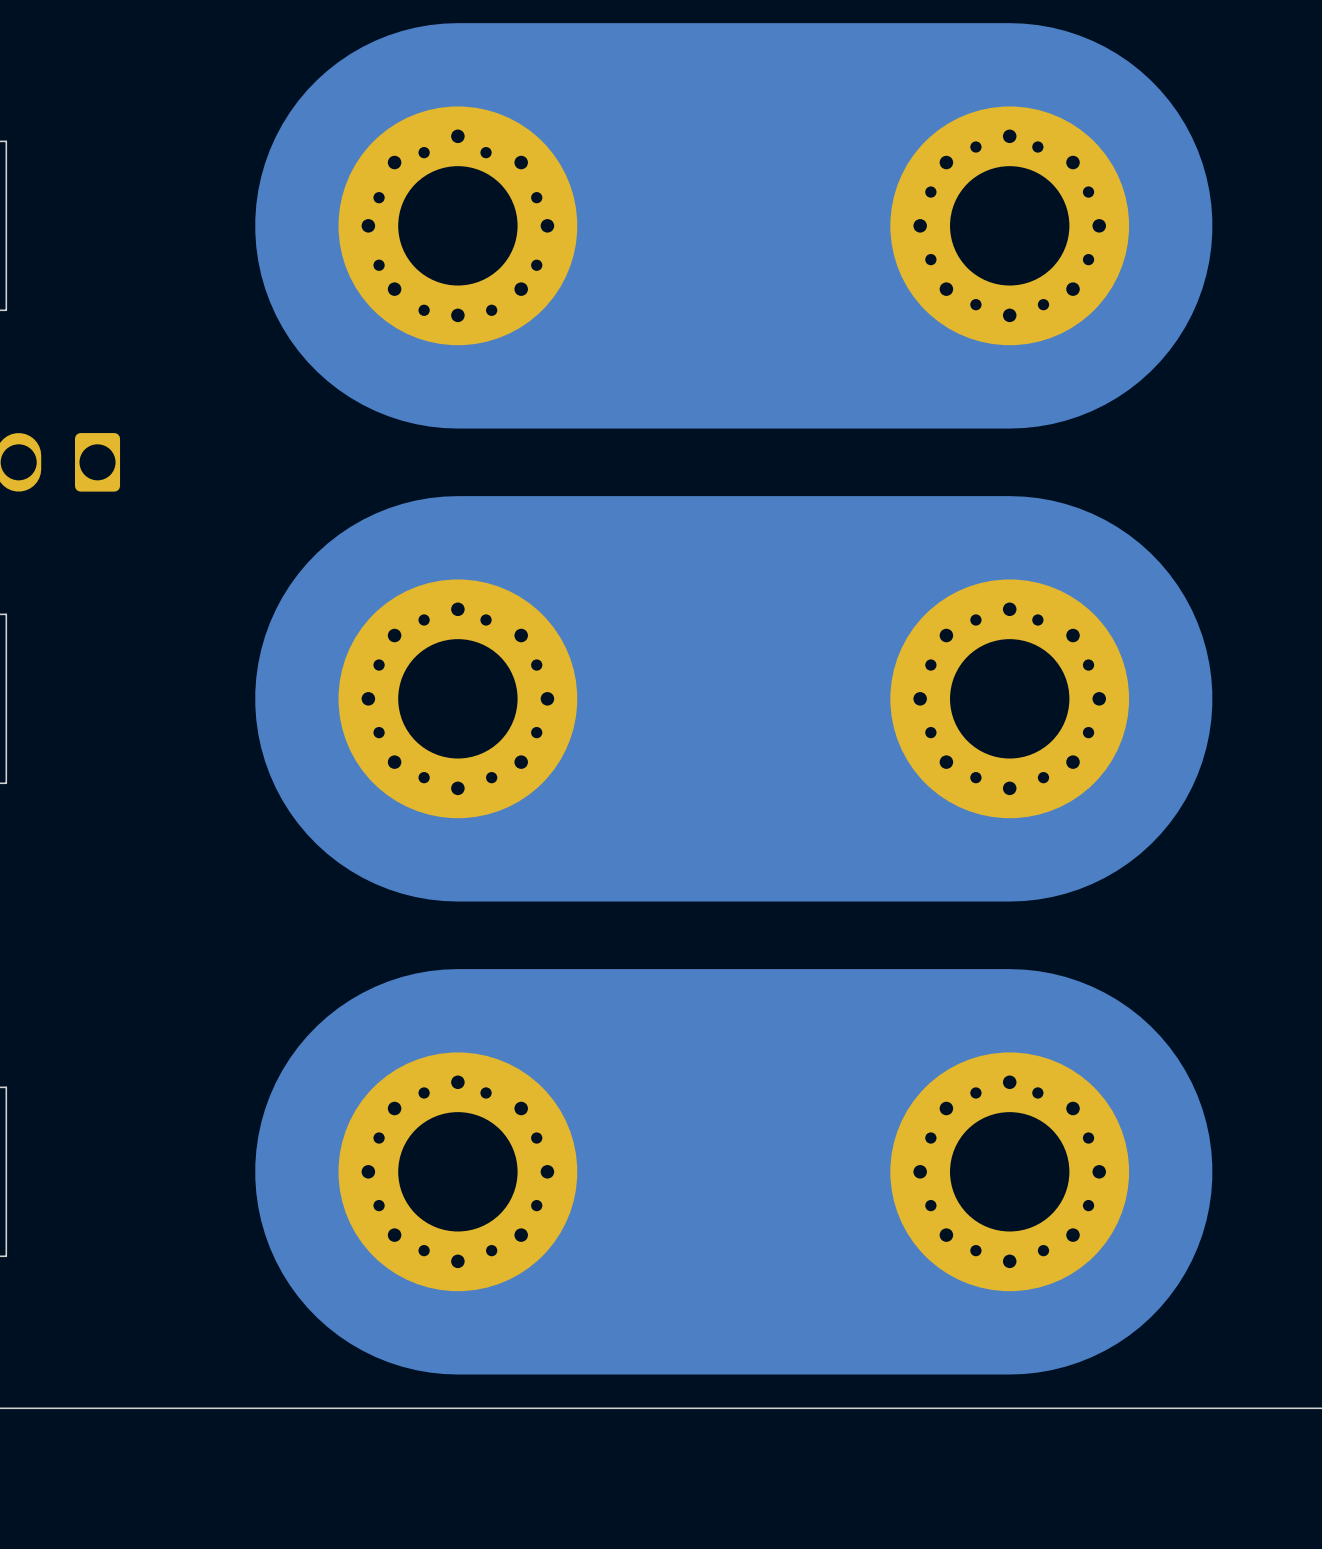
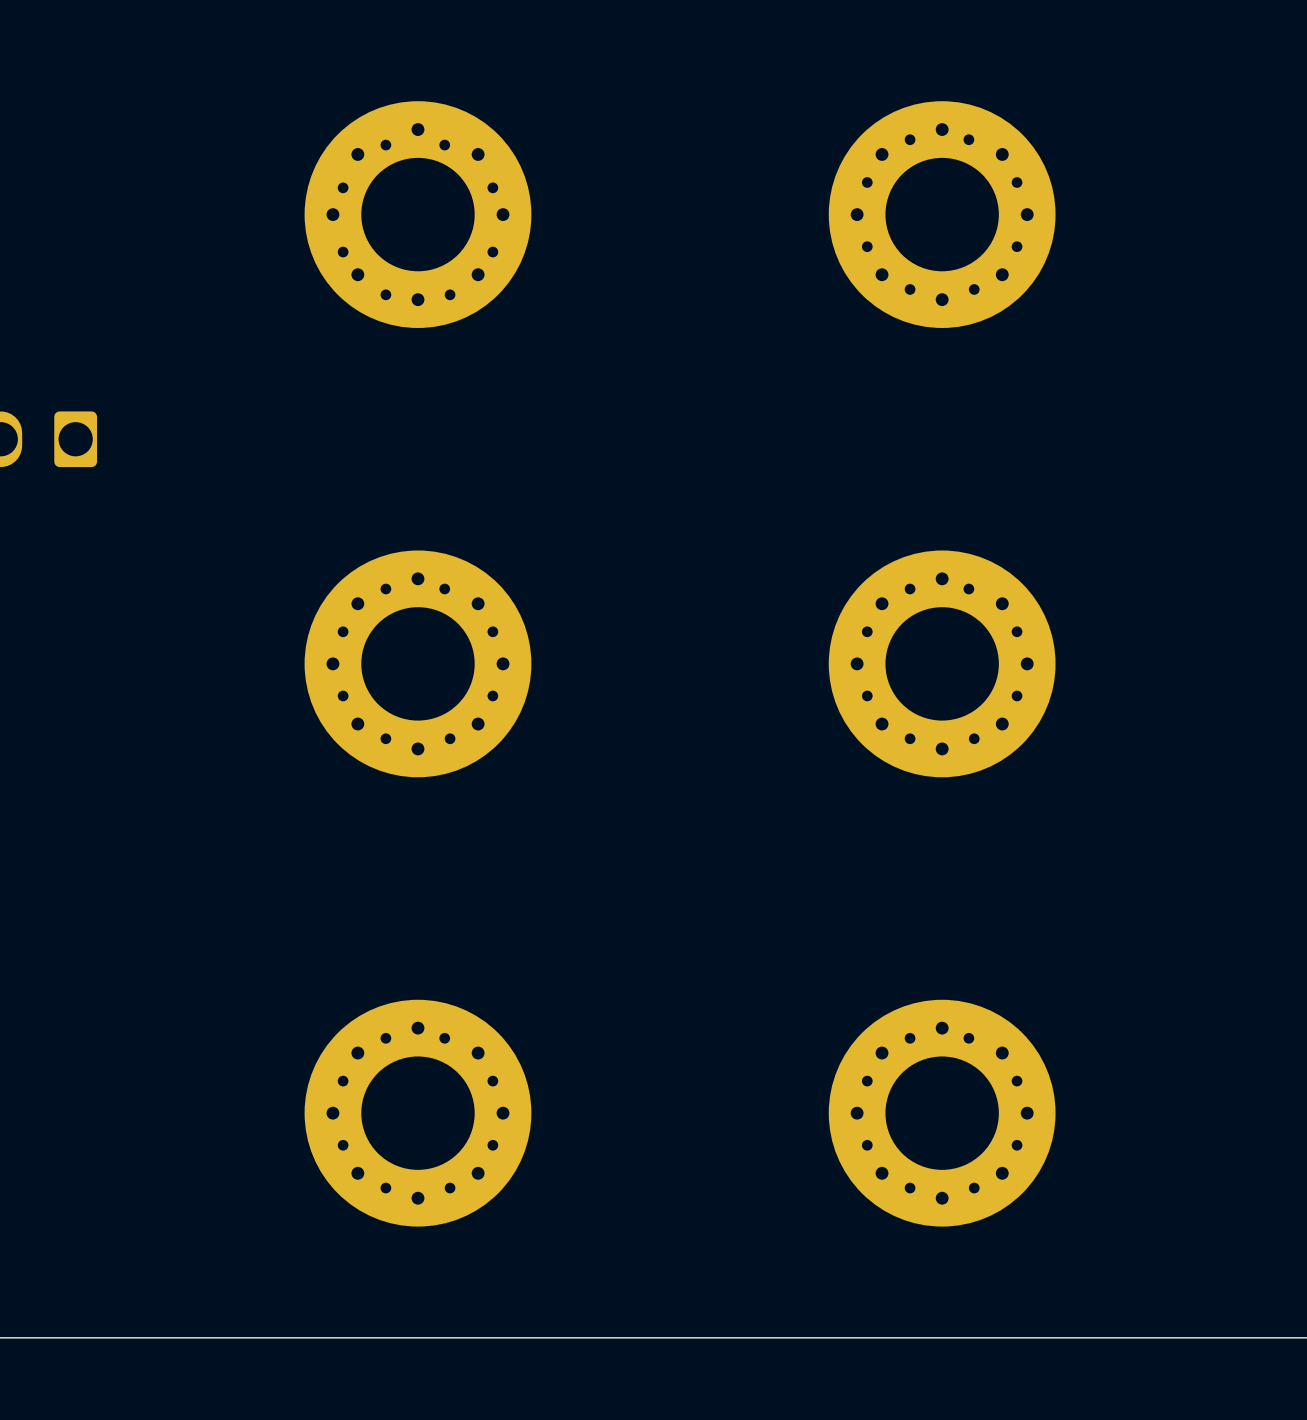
track: (1009, 225) (457, 225) -> none
track: (1009, 698) (457, 698) -> none
track: (1009, 1171) (457, 1171) -> none

